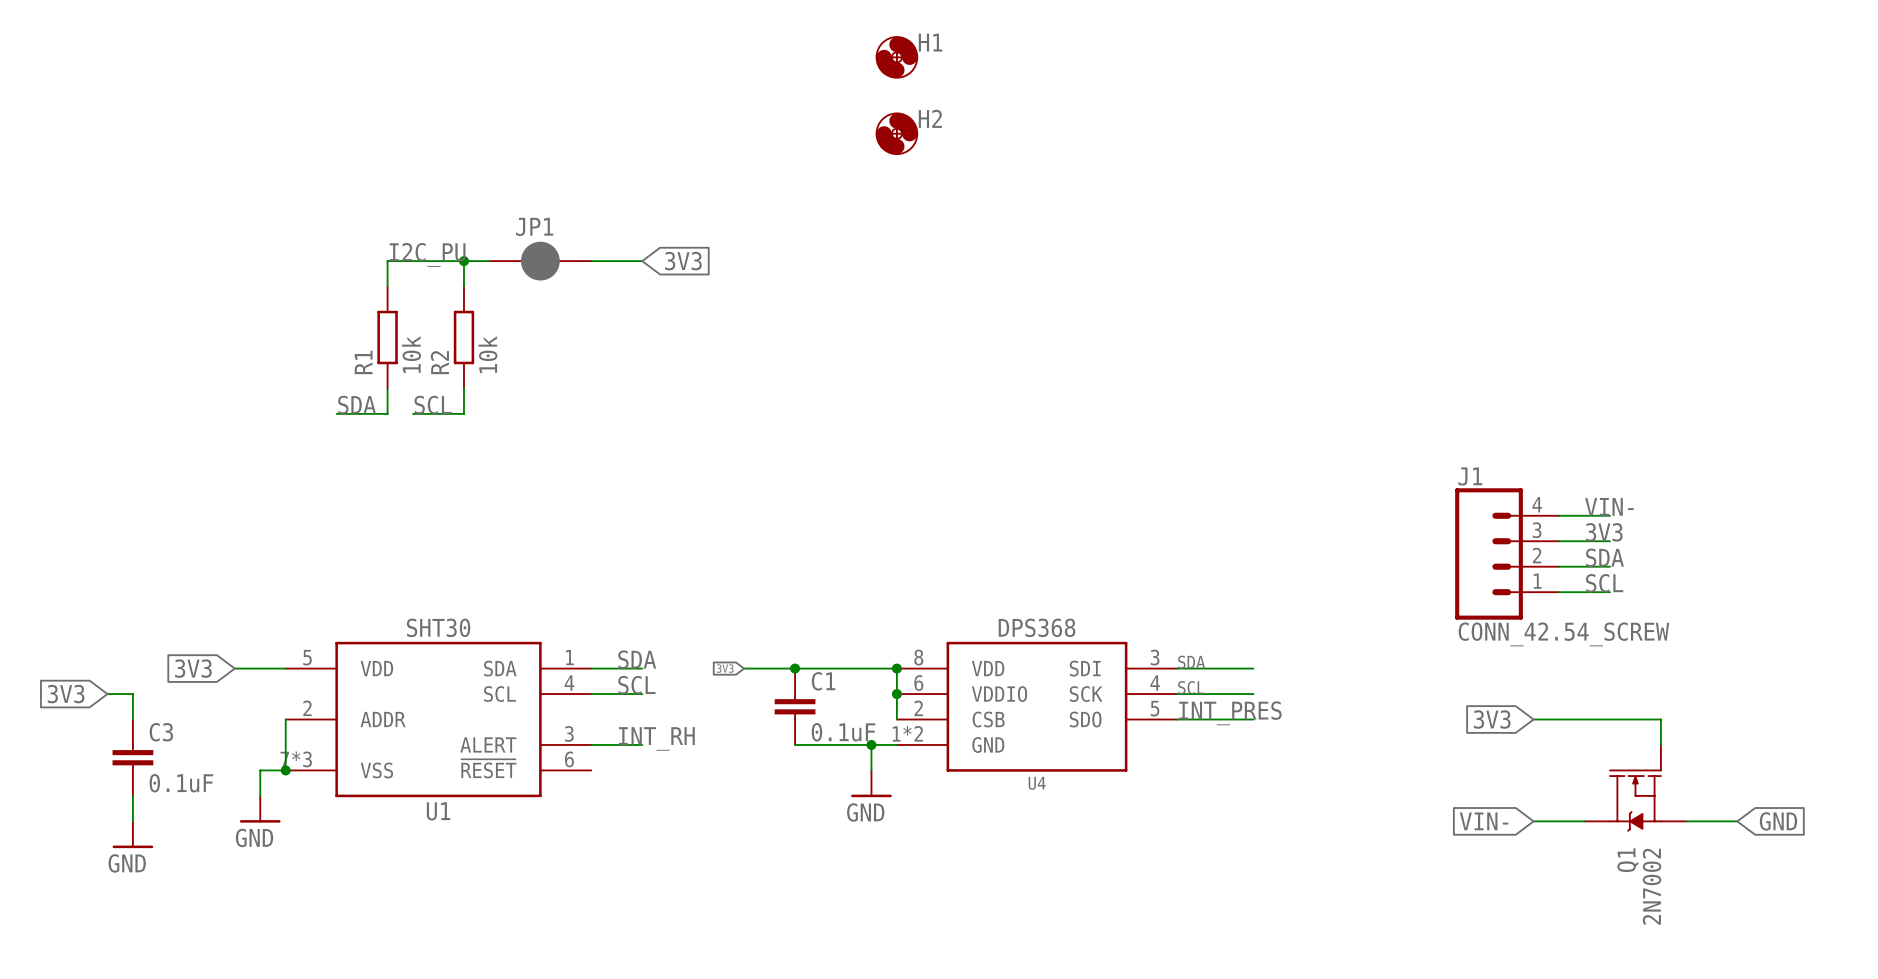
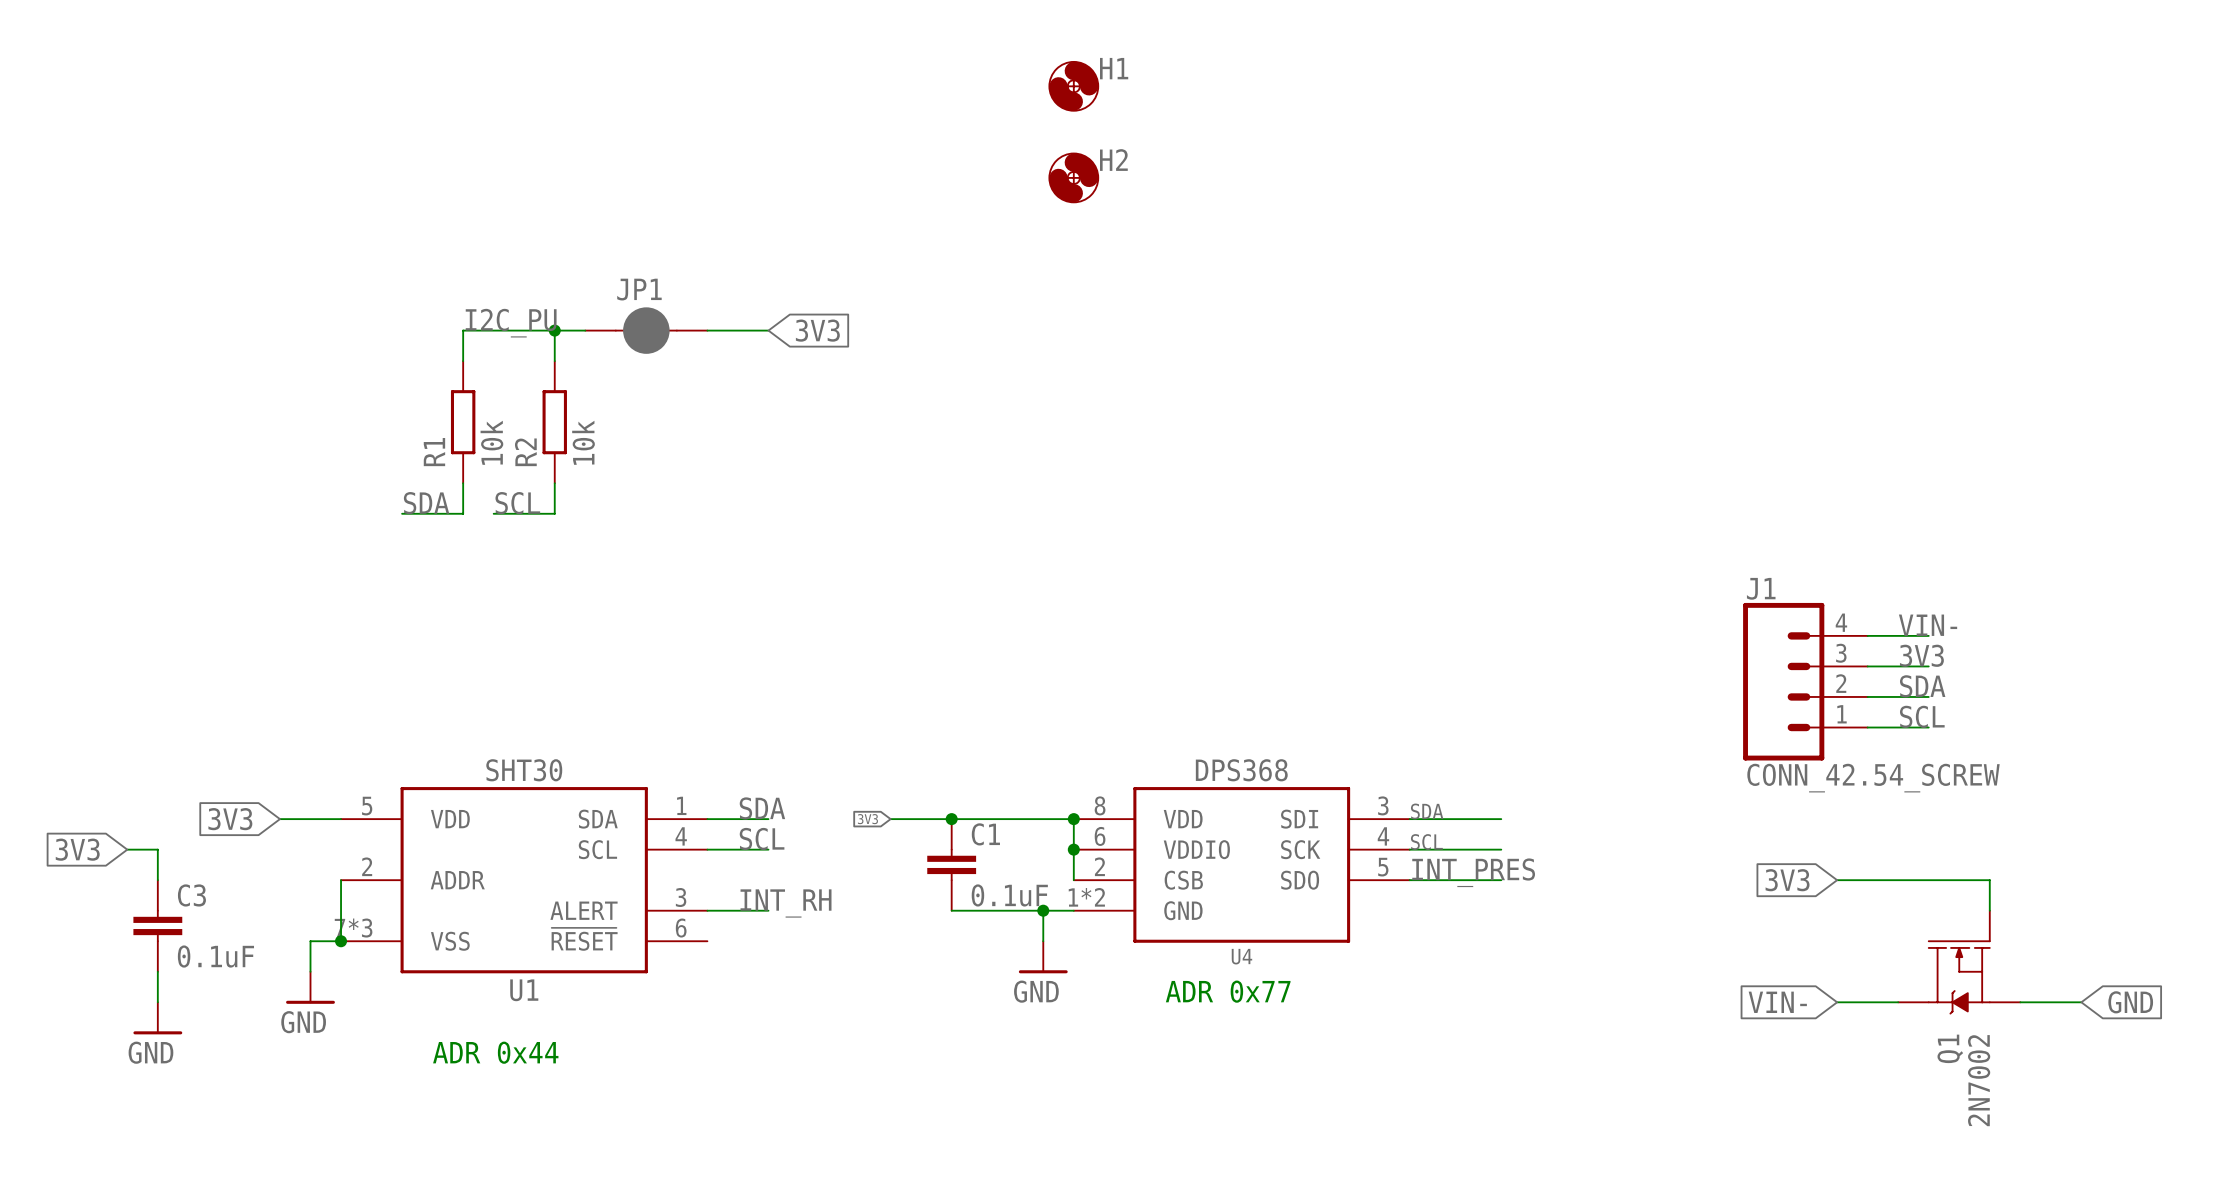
text: none -> ADR 0x77 (1228, 991)
text: none -> ADR 0x44 (495, 1052)

